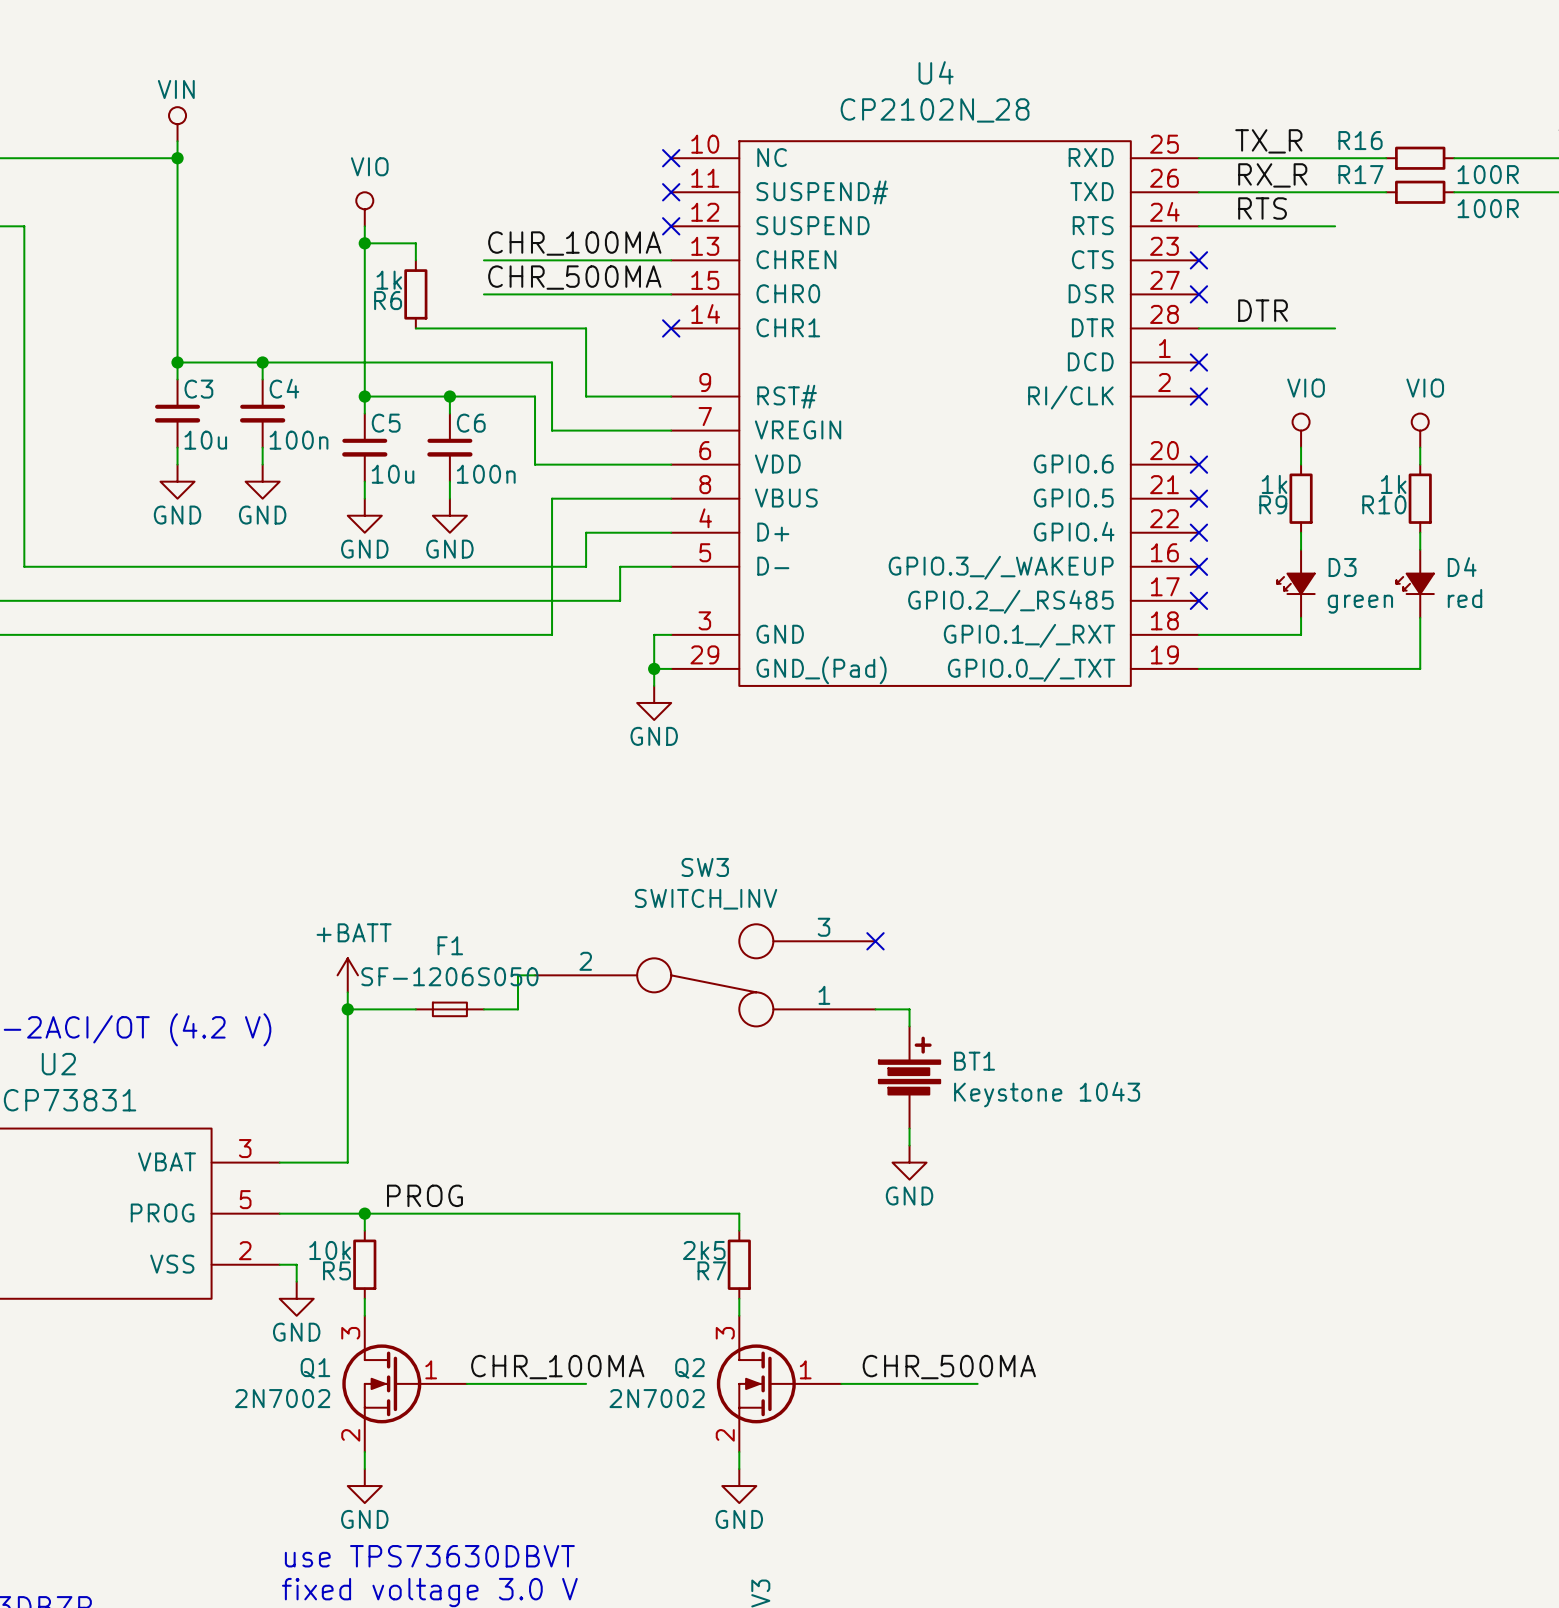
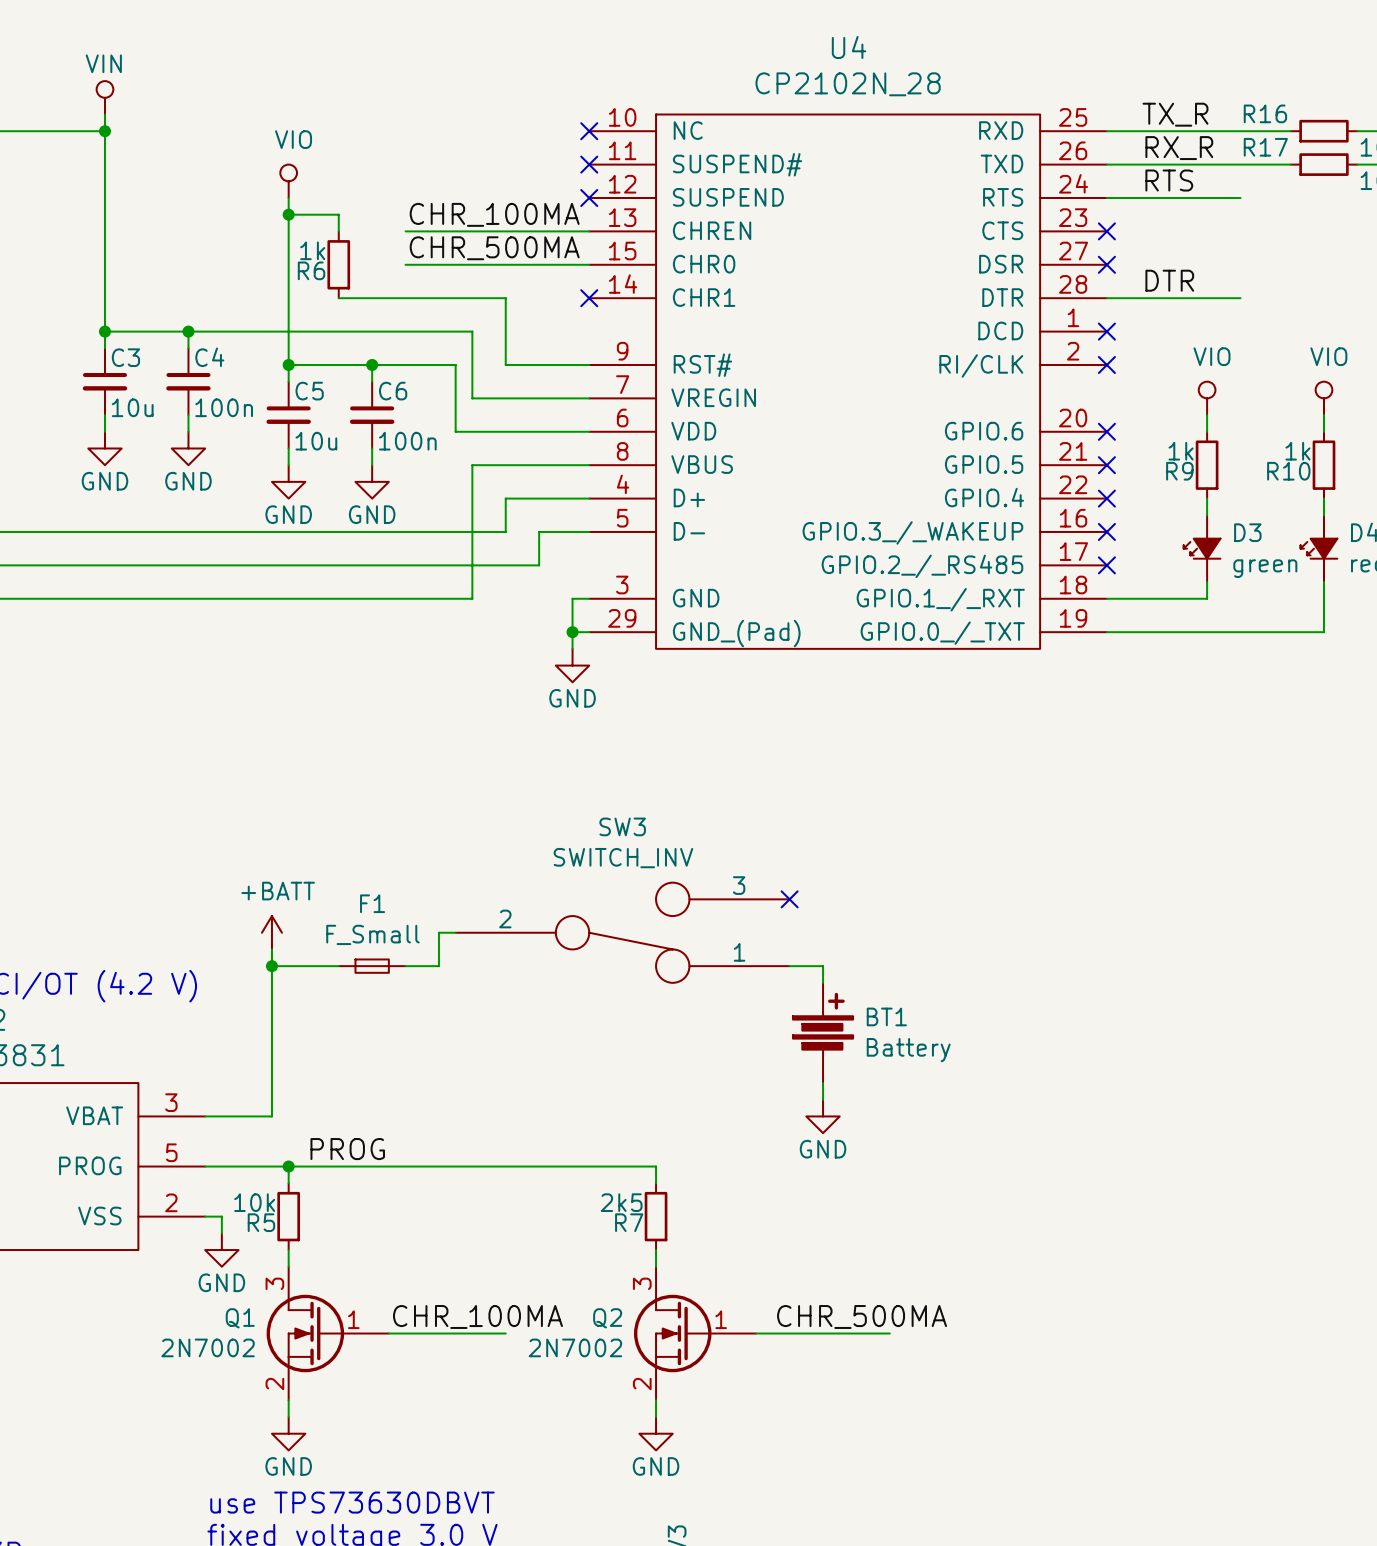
F1 value: SF-1206S050 (449, 976) -> F_Small (372, 934)
BT1 value: Keystone 1043 (1047, 1094) -> Battery (908, 1050)

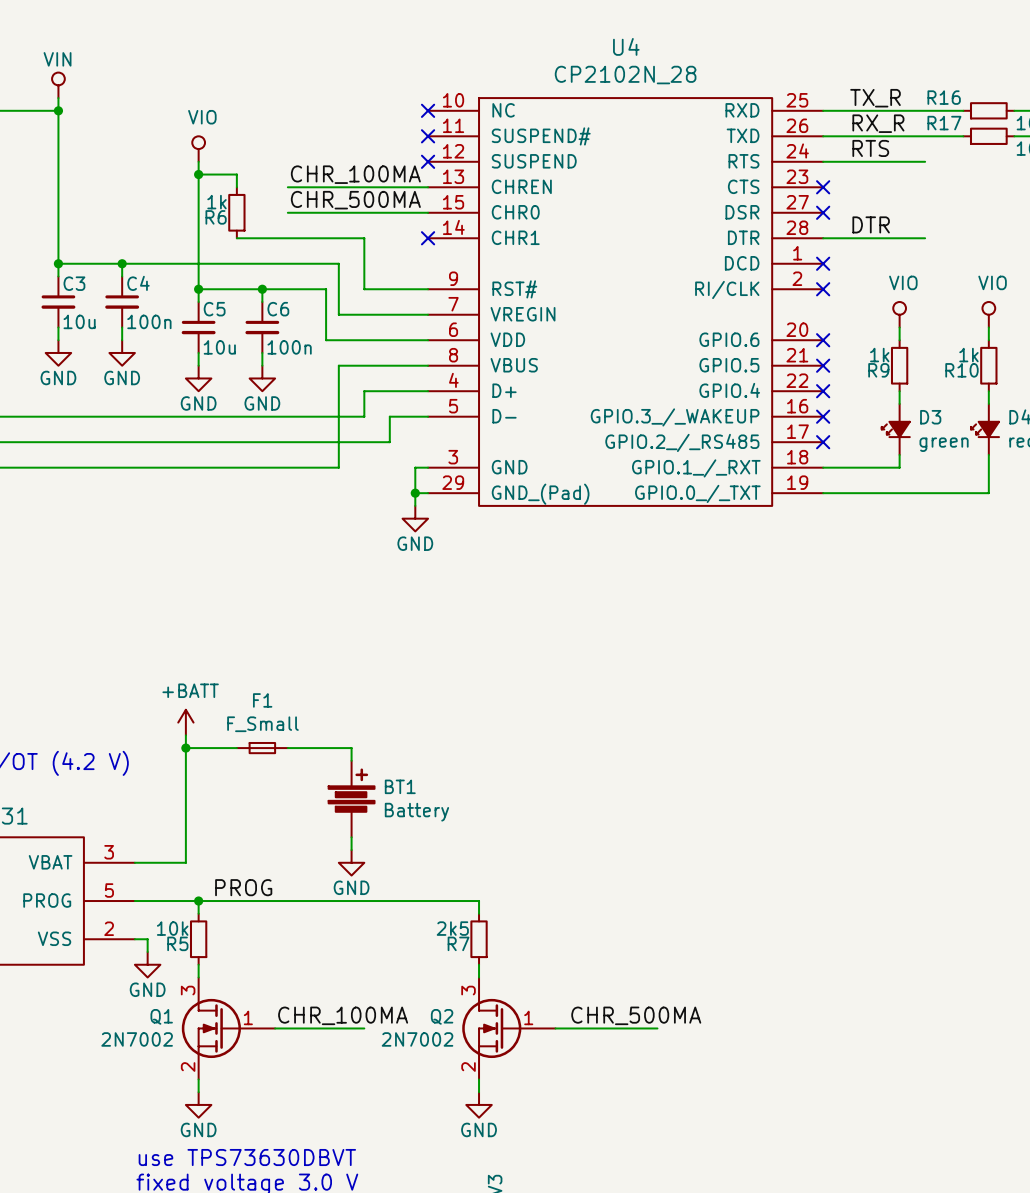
no-connect mark: (789, 899) -> none
wire: (455, 932) (438, 932) (438, 966) -> (351, 760) (351, 748) (313, 748)
SW3: SWITCH_INV (622, 932) -> none
wire: (789, 966) (823, 966) (823, 982) -> none
BT1 position: (823, 1032) -> (351, 799)
wire: none -> (351, 837) (351, 850)
wire: (823, 1083) (823, 1099) -> none
power symbol: none -> GND (351, 862)
power symbol: GND (823, 1116) -> none

